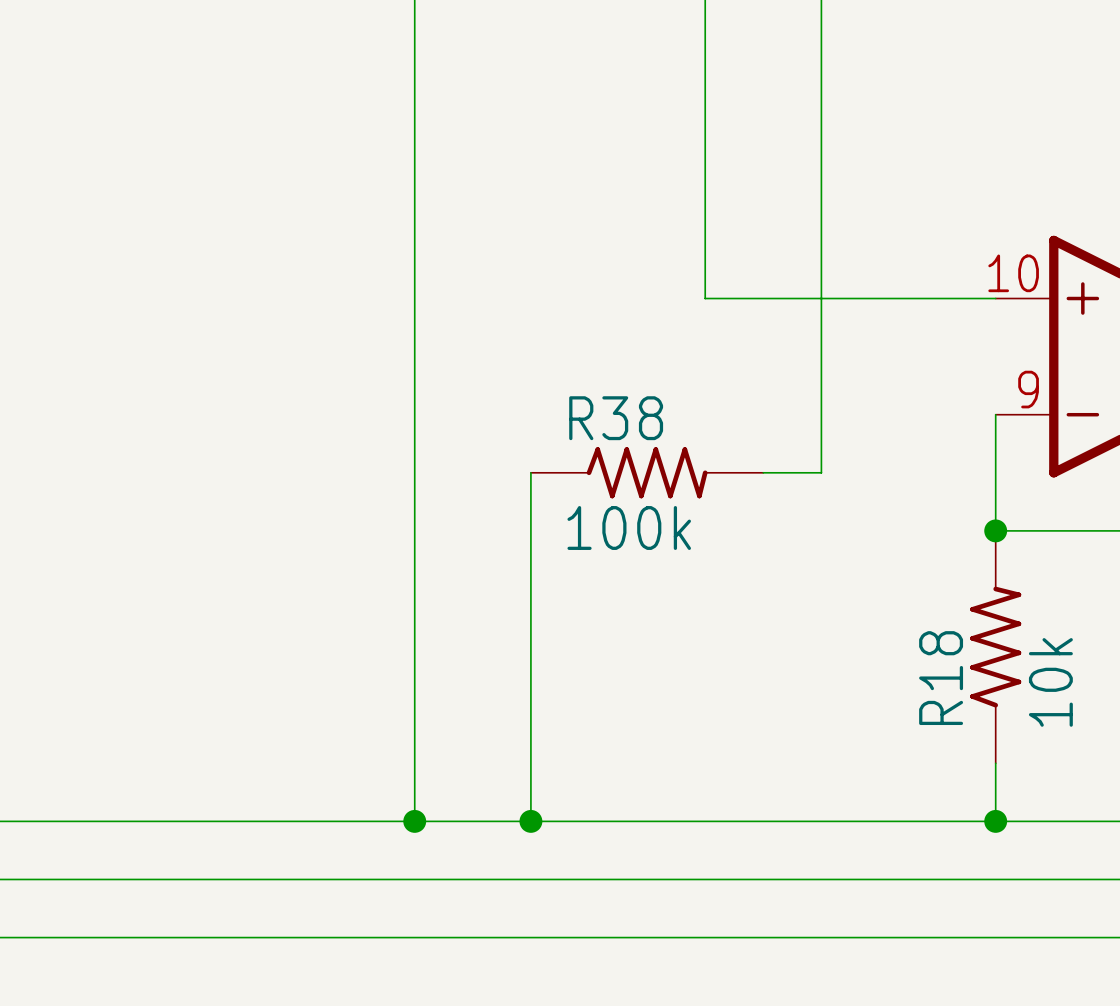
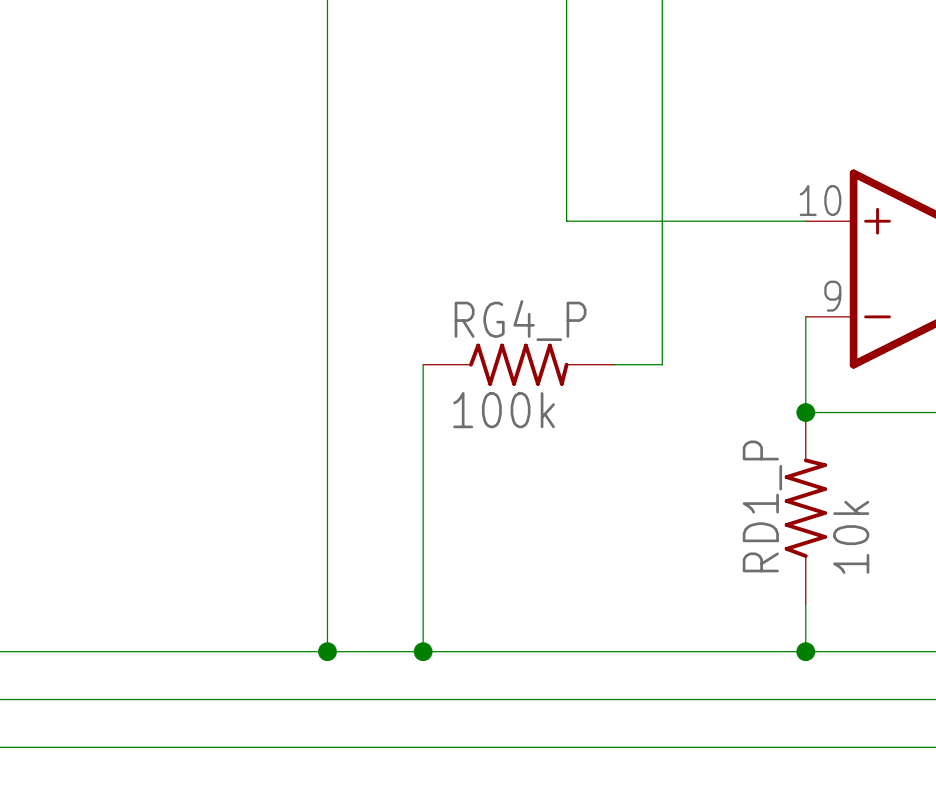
R38 name: R38 (616, 418) -> RG4_P (520, 320)
R18 name: R18 (941, 678) -> RD1_P (762, 506)

